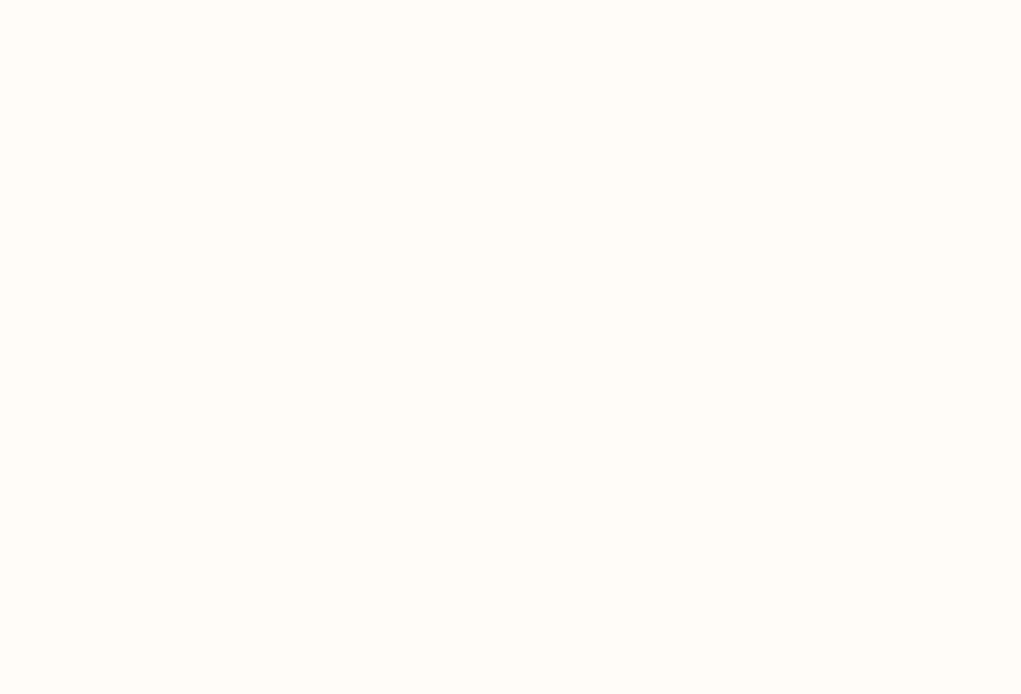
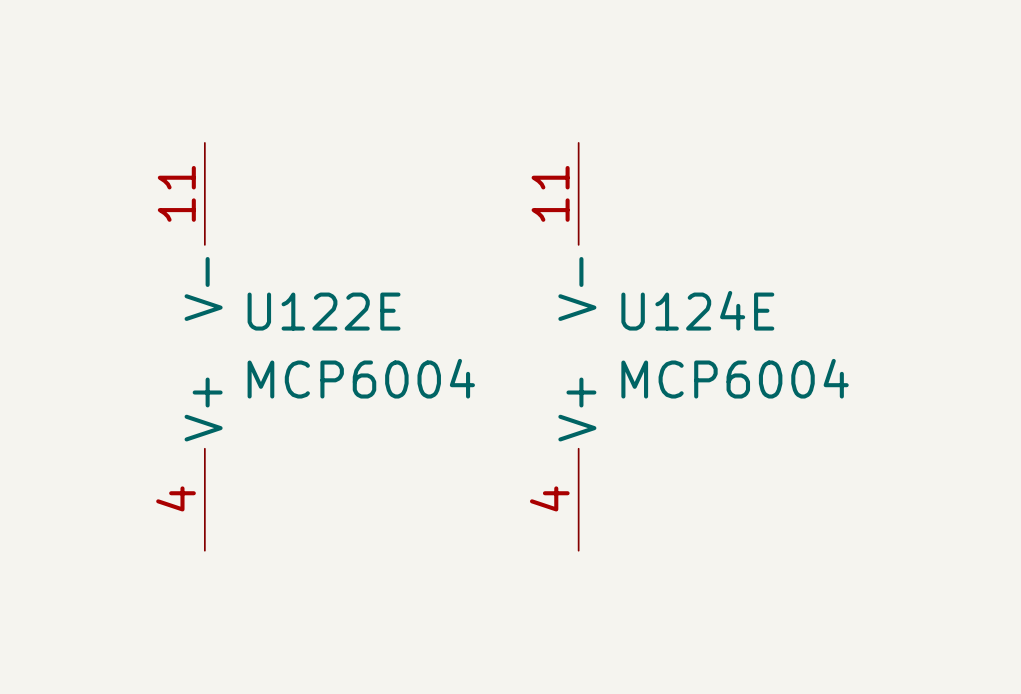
U122E: none -> MCP6004 (204, 346)
U124E: none -> MCP6004 (578, 346)

